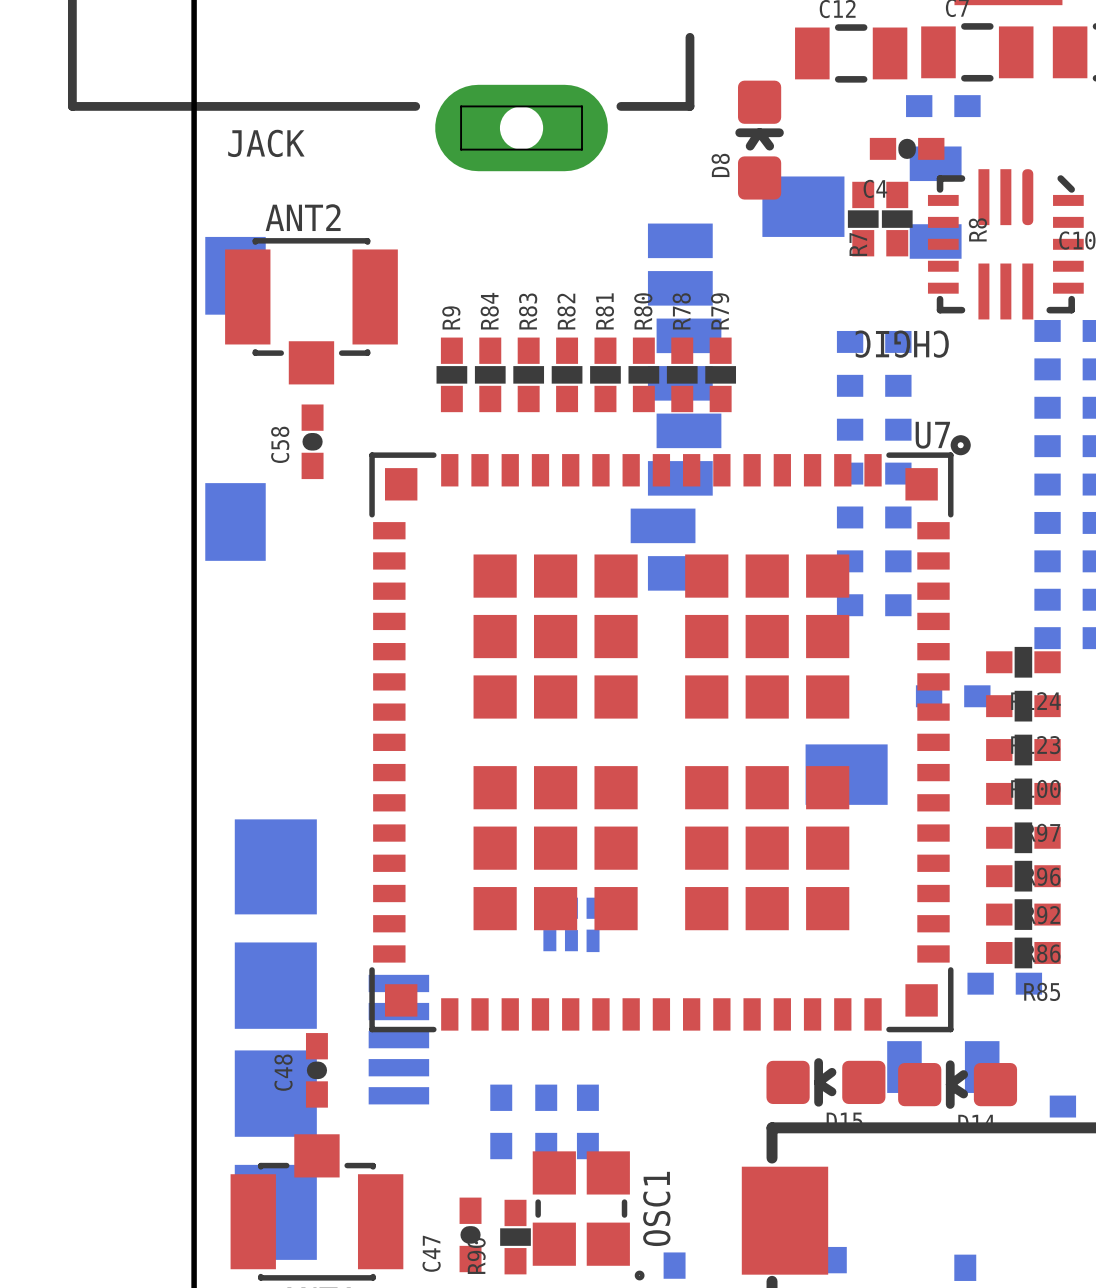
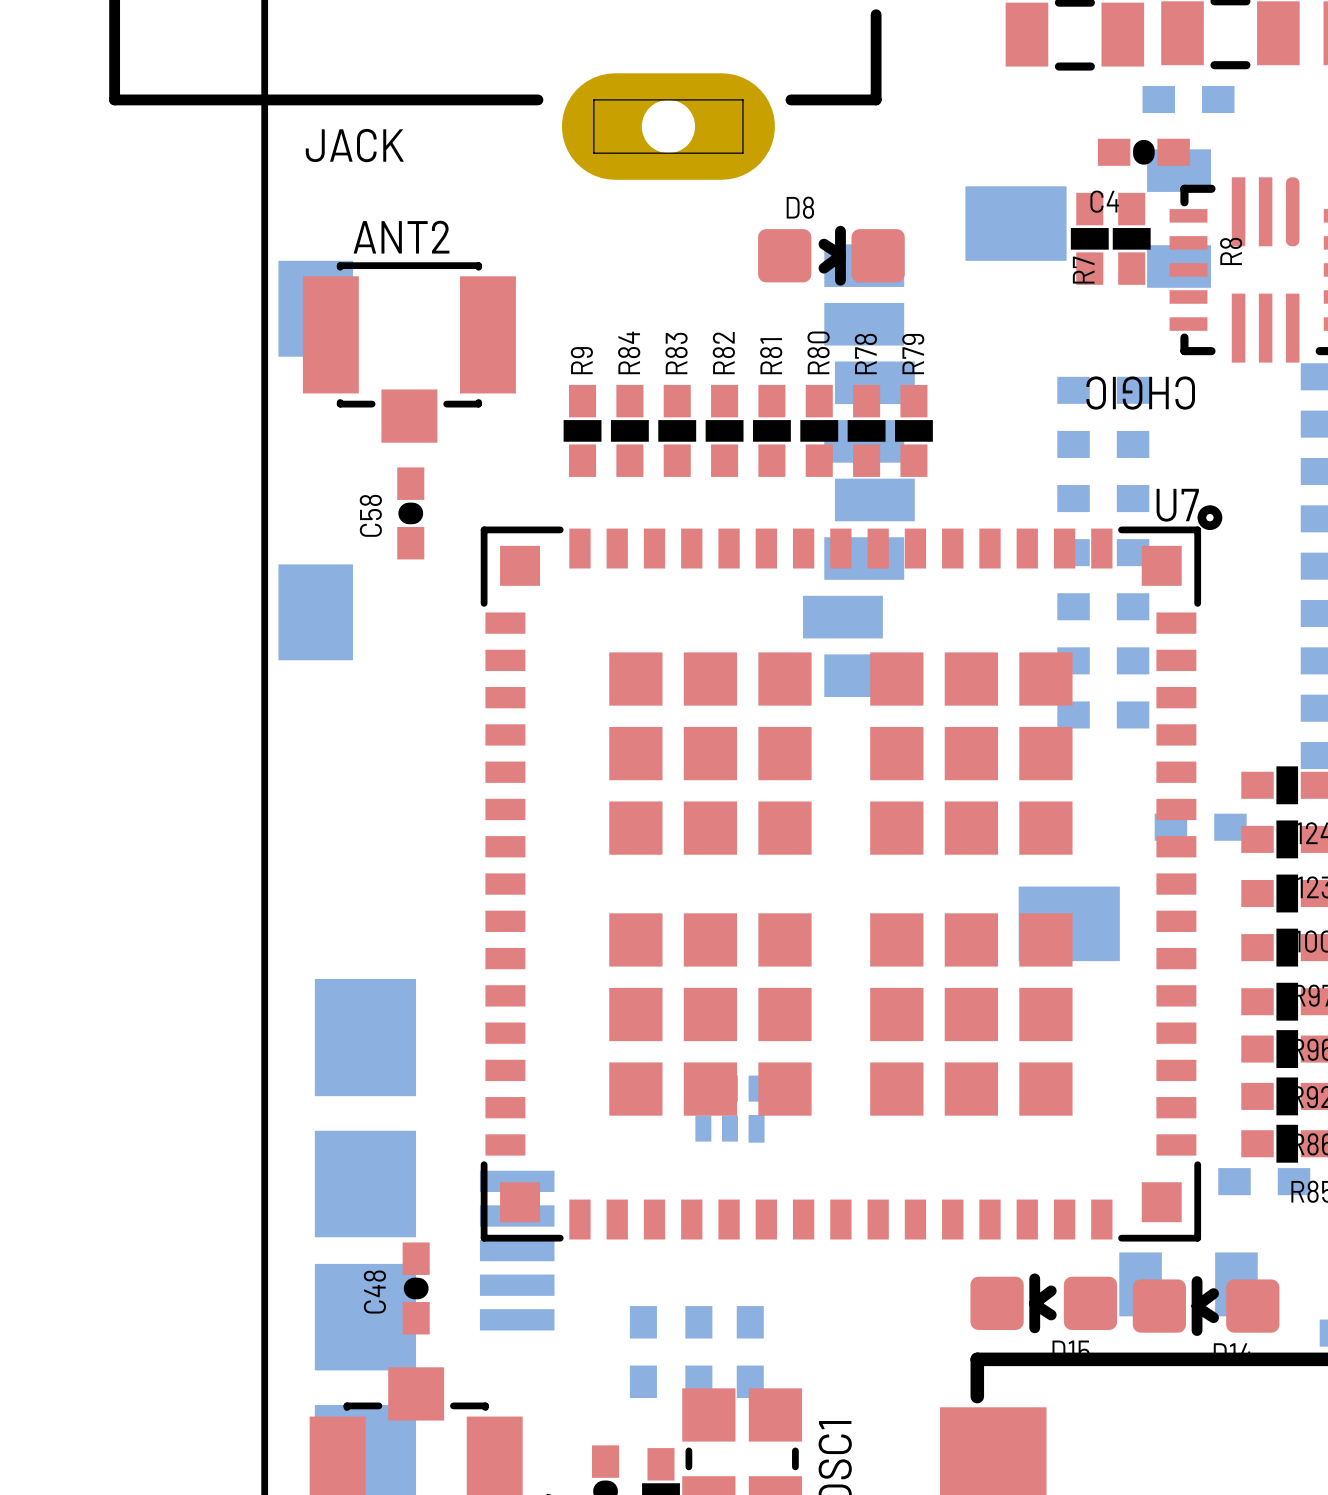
D8 rotation: 0° (759, 140) -> 90° clockwise (831, 255)
D8 position: (759, 140) -> (831, 255)

